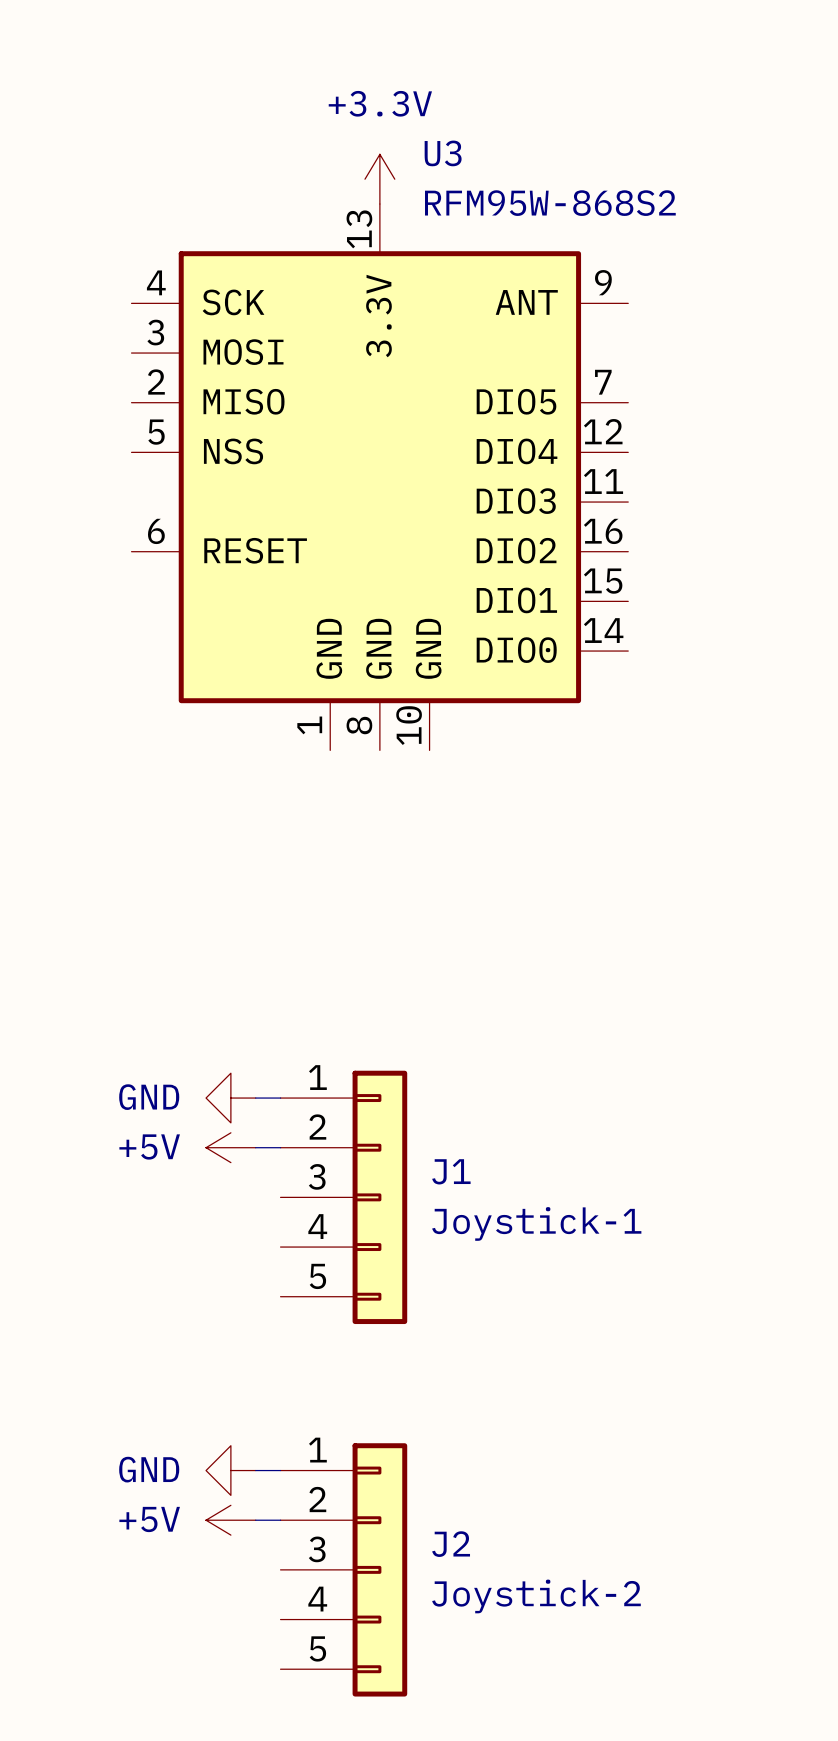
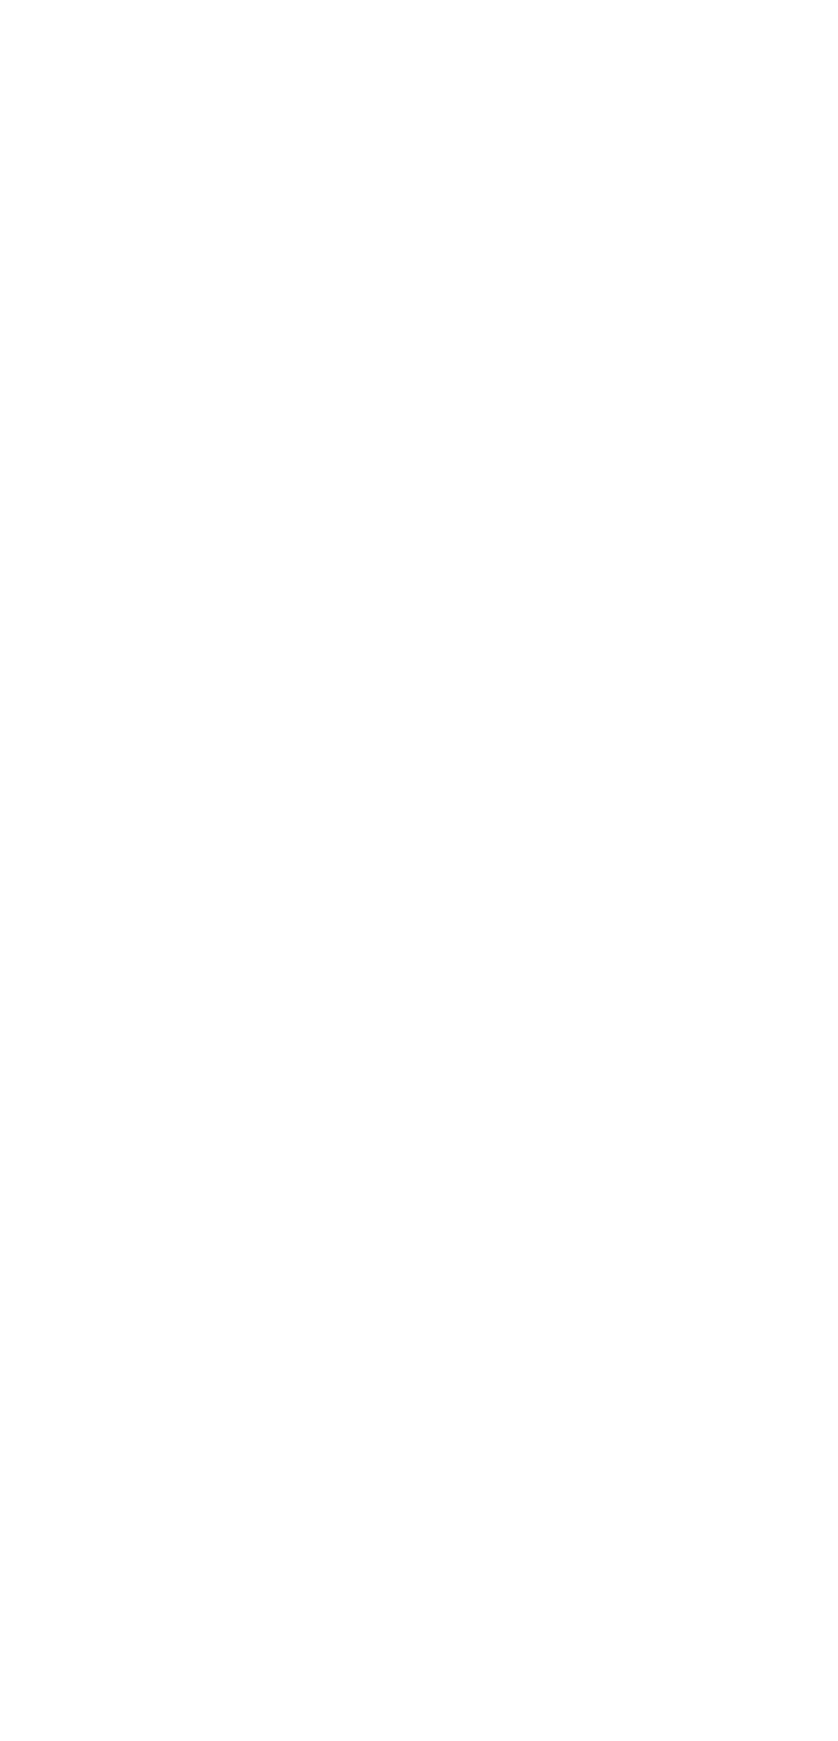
power symbol: +3.3V (379, 179) -> none
U3: RFM95W-868S2 (379, 477) -> none
power symbol: GND (230, 1098) -> none
wire: (255, 1098) (280, 1098) -> none
power symbol: +5V (230, 1147) -> none
wire: (255, 1147) (280, 1147) -> none
J1: Joystick-1 (343, 1197) -> none
power symbol: GND (230, 1470) -> none
wire: (255, 1470) (280, 1470) -> none
power symbol: +5V (230, 1520) -> none
wire: (255, 1520) (280, 1520) -> none
J2: Joystick-2 (343, 1569) -> none

